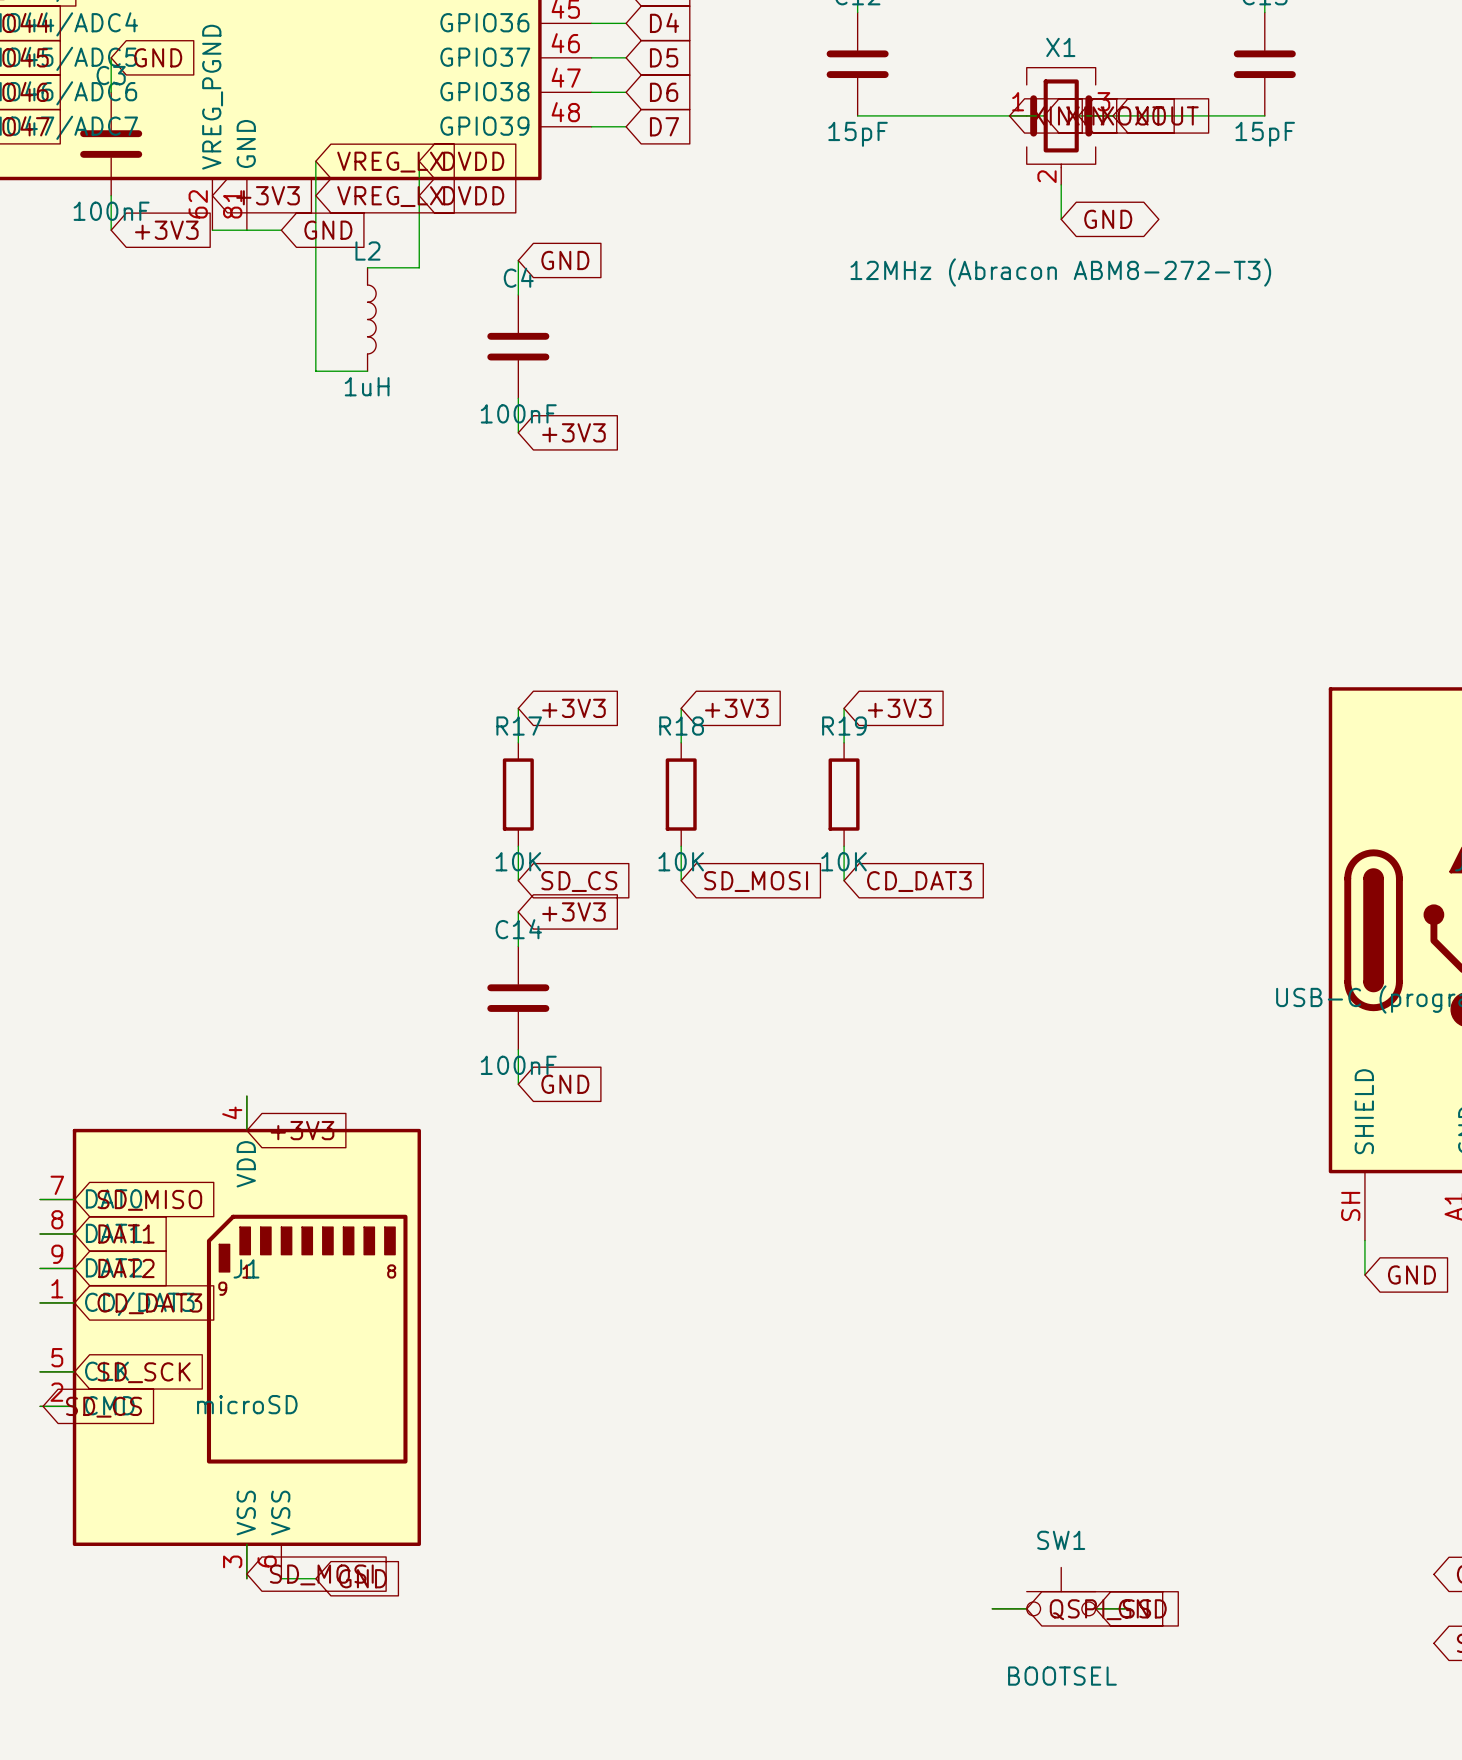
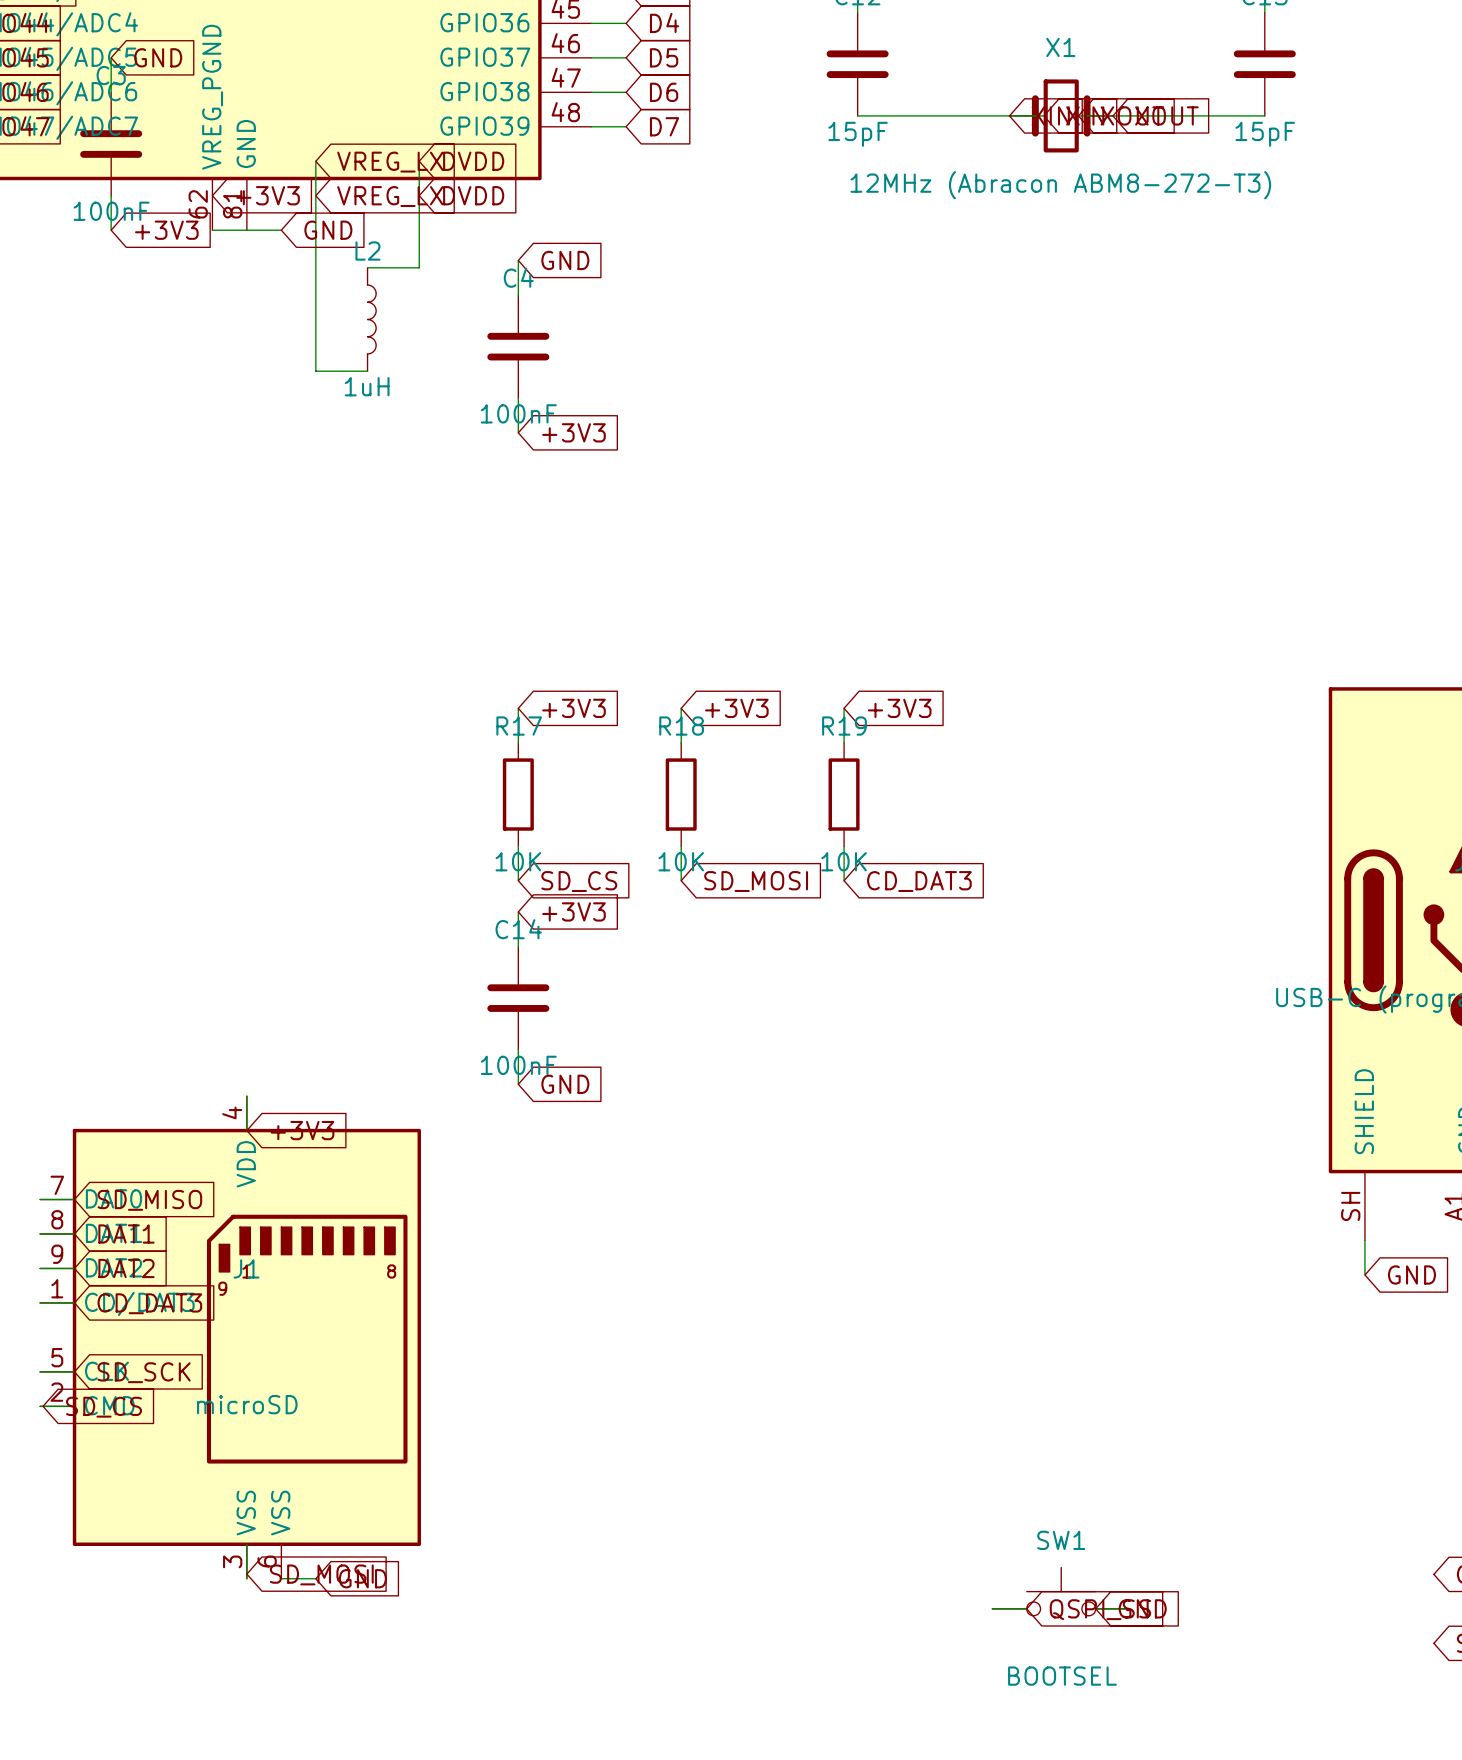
X1 symbol: [1009, 67, 1113, 185] -> [1009, 79, 1113, 153]
wire: (1061, 184) (1061, 219) -> none
global label: GND (1108, 219) -> none
X1 value position: 12MHz (Abracon ABM8-272-T3) (1060, 272) -> 12MHz (Abracon ABM8-272-T3) (1060, 185)

